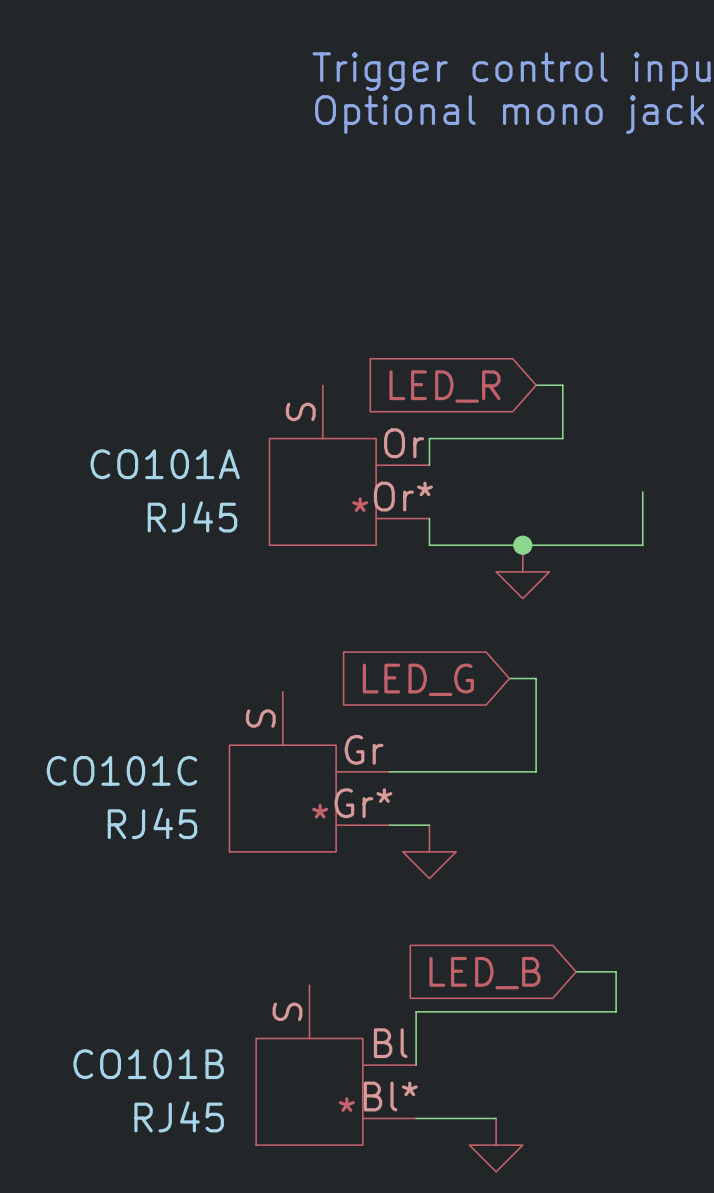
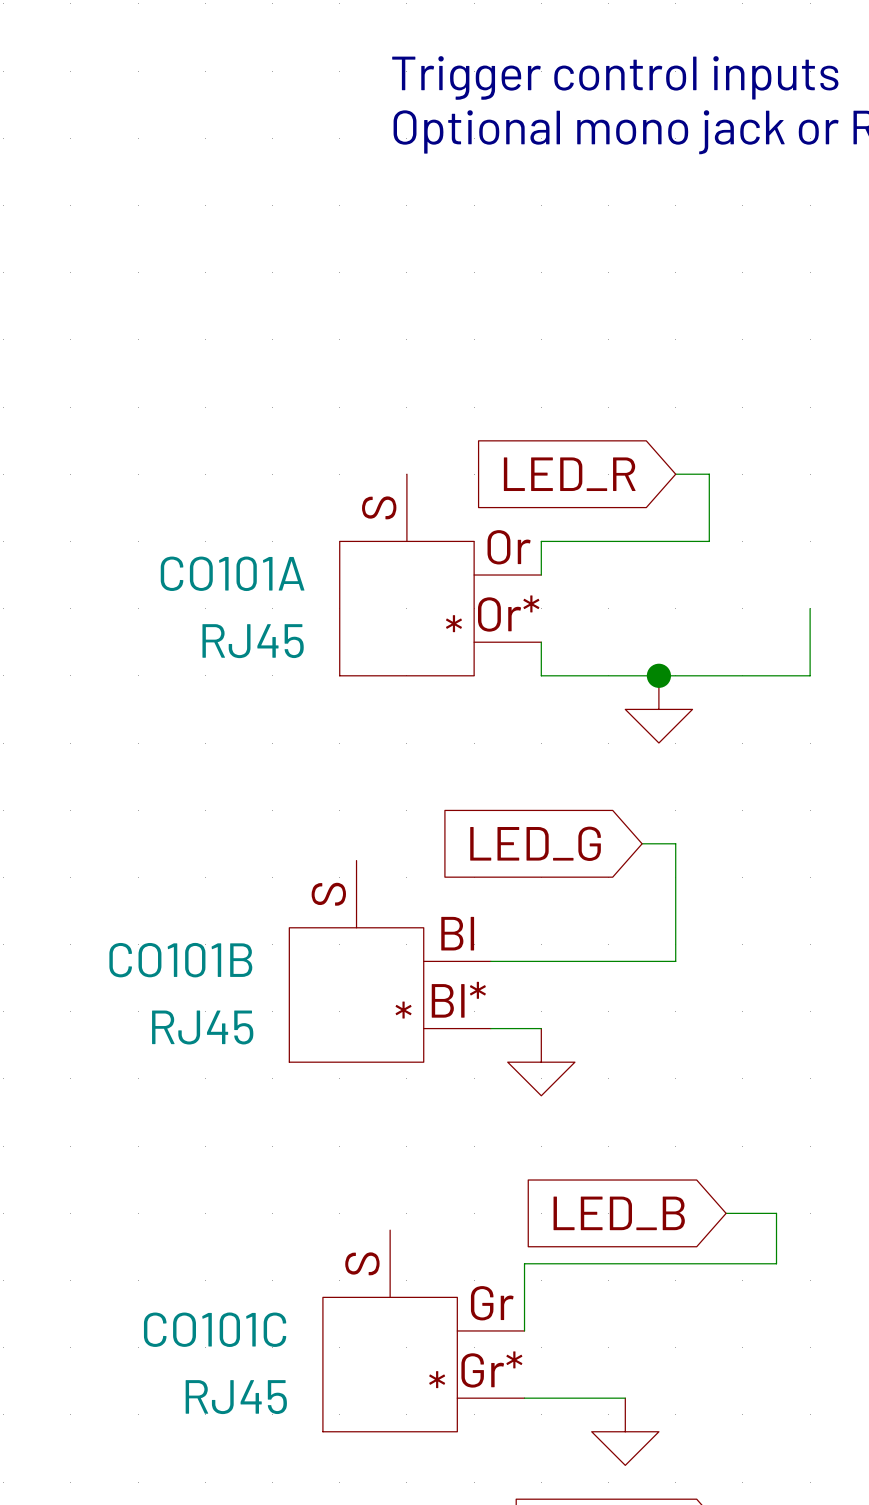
CO101C position: (309, 771) -> (423, 1330)
CO101B position: (336, 1065) -> (390, 961)

